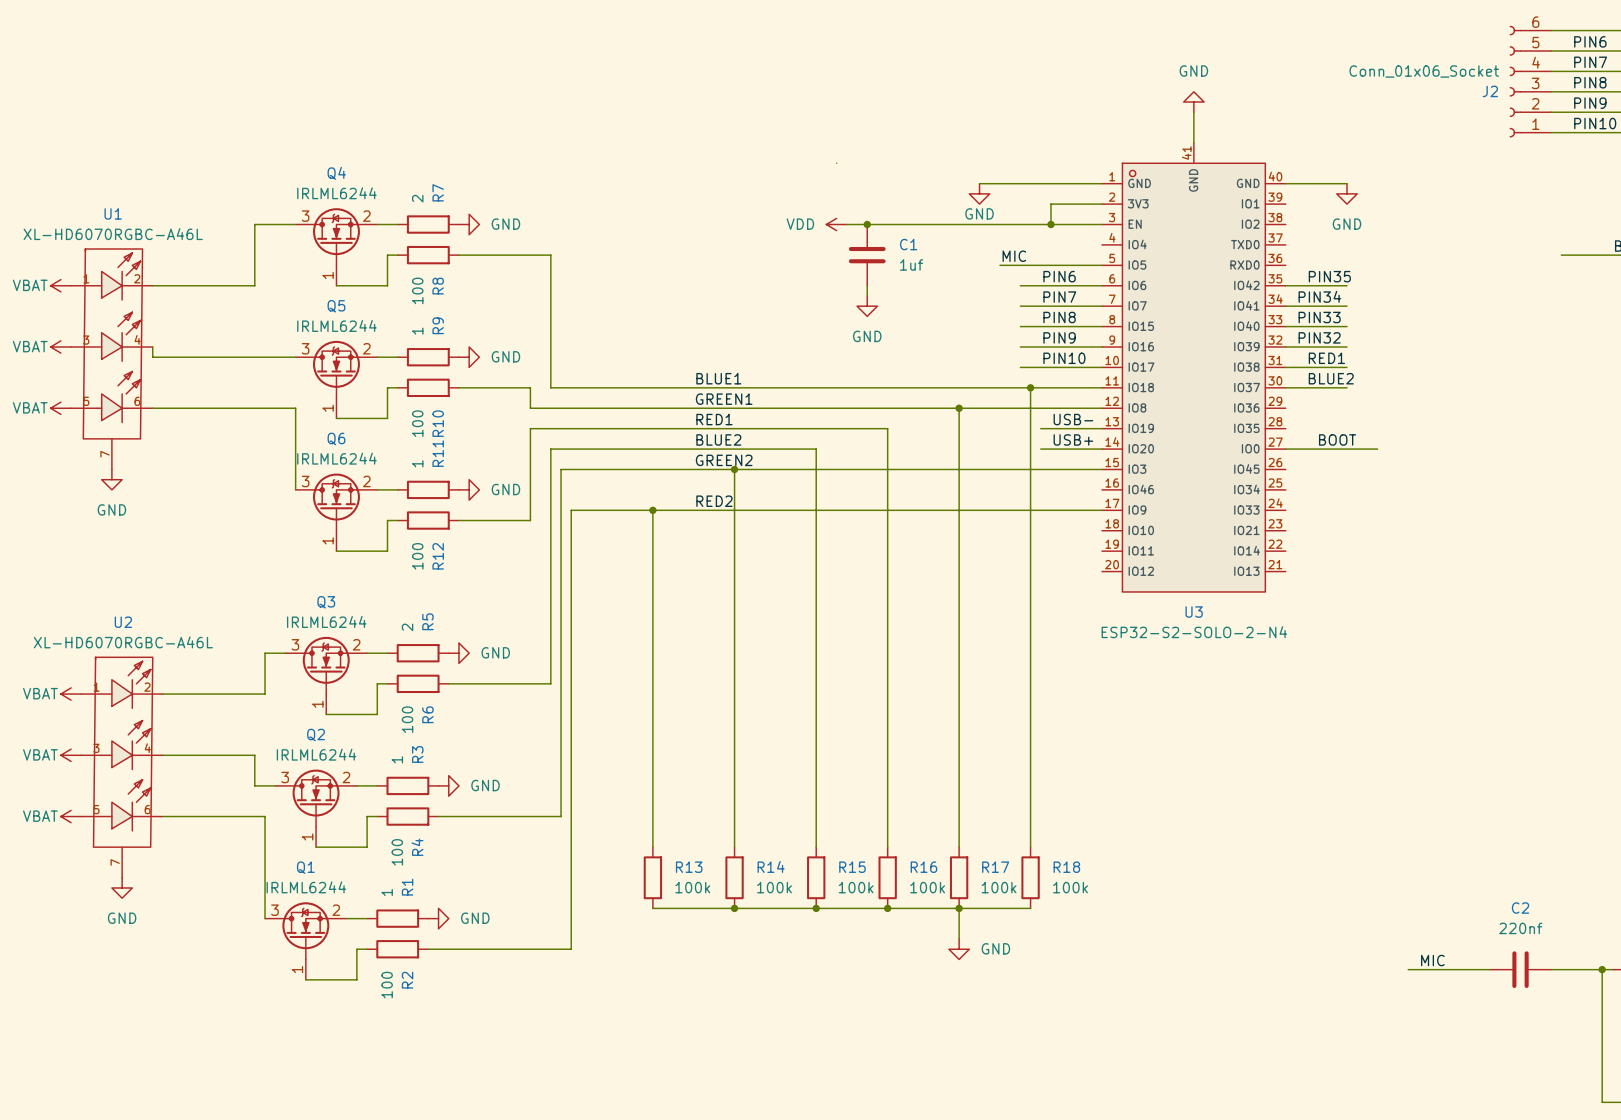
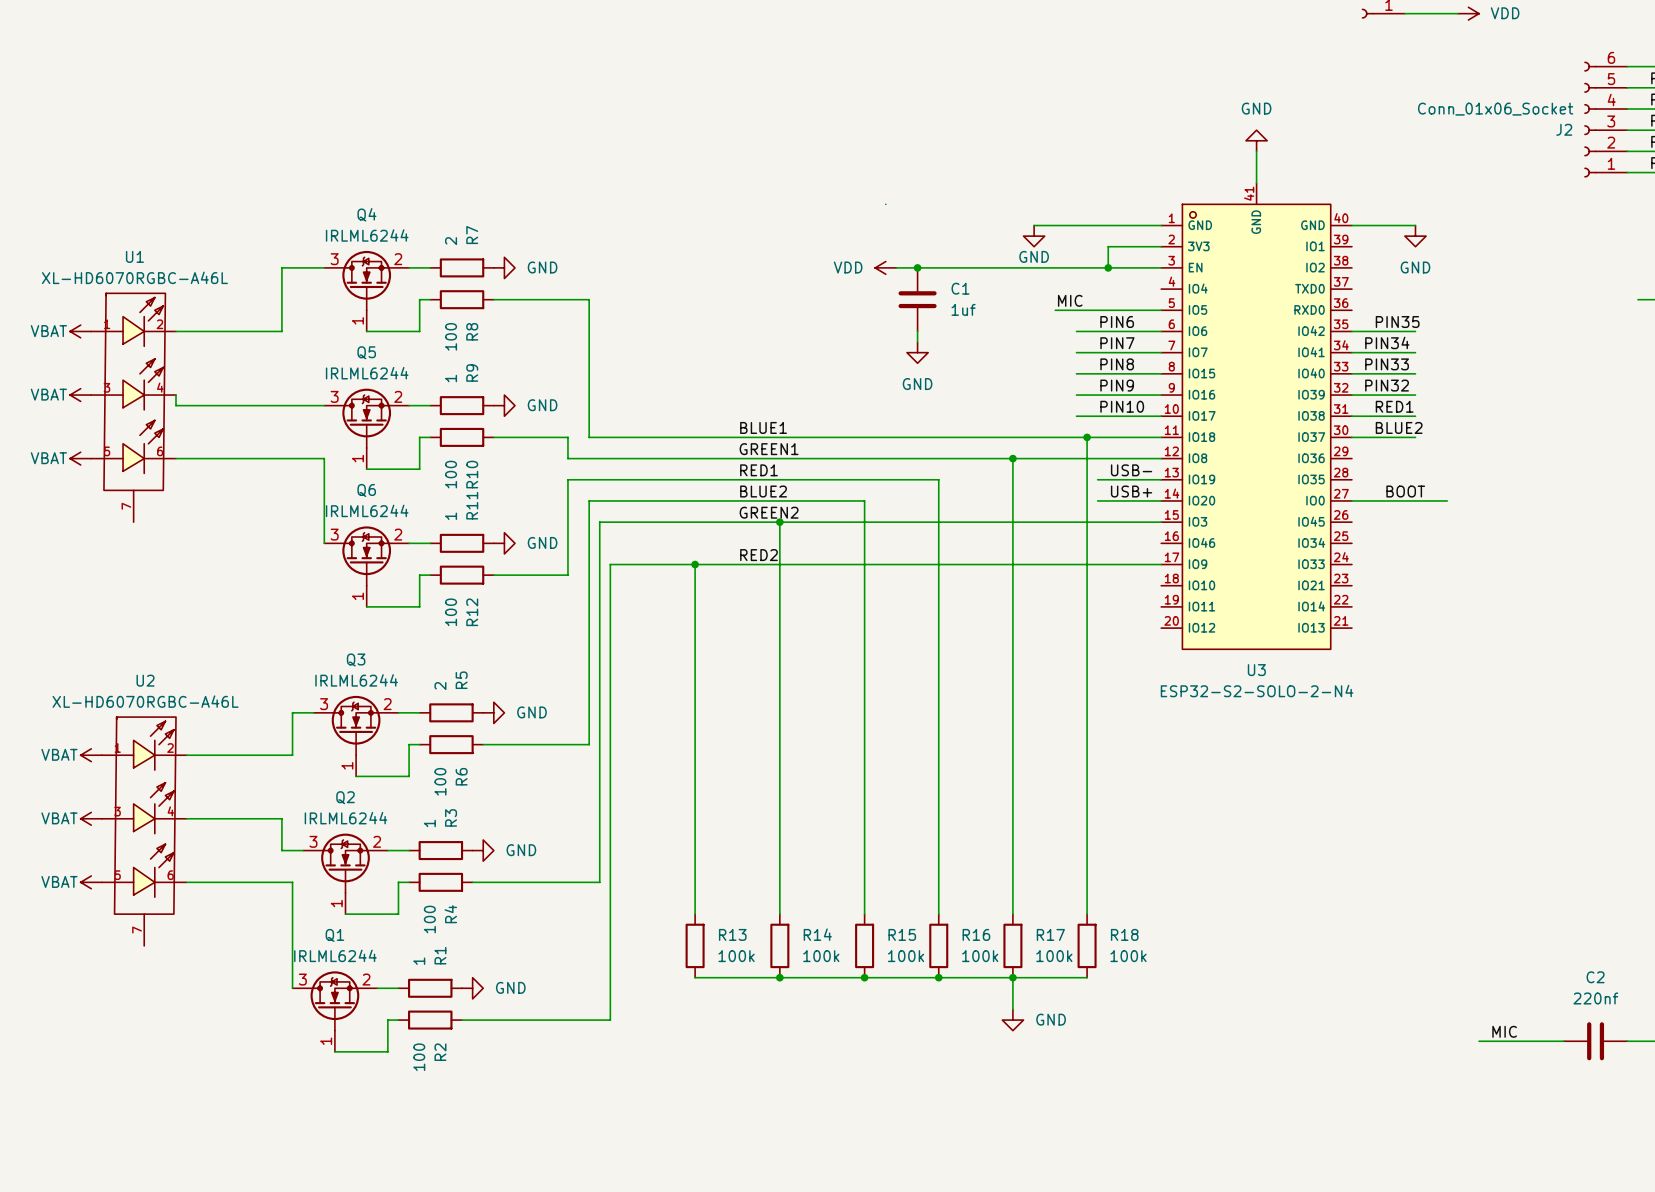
power symbol: GND (111, 479) -> none
power symbol: GND (122, 887) -> none

